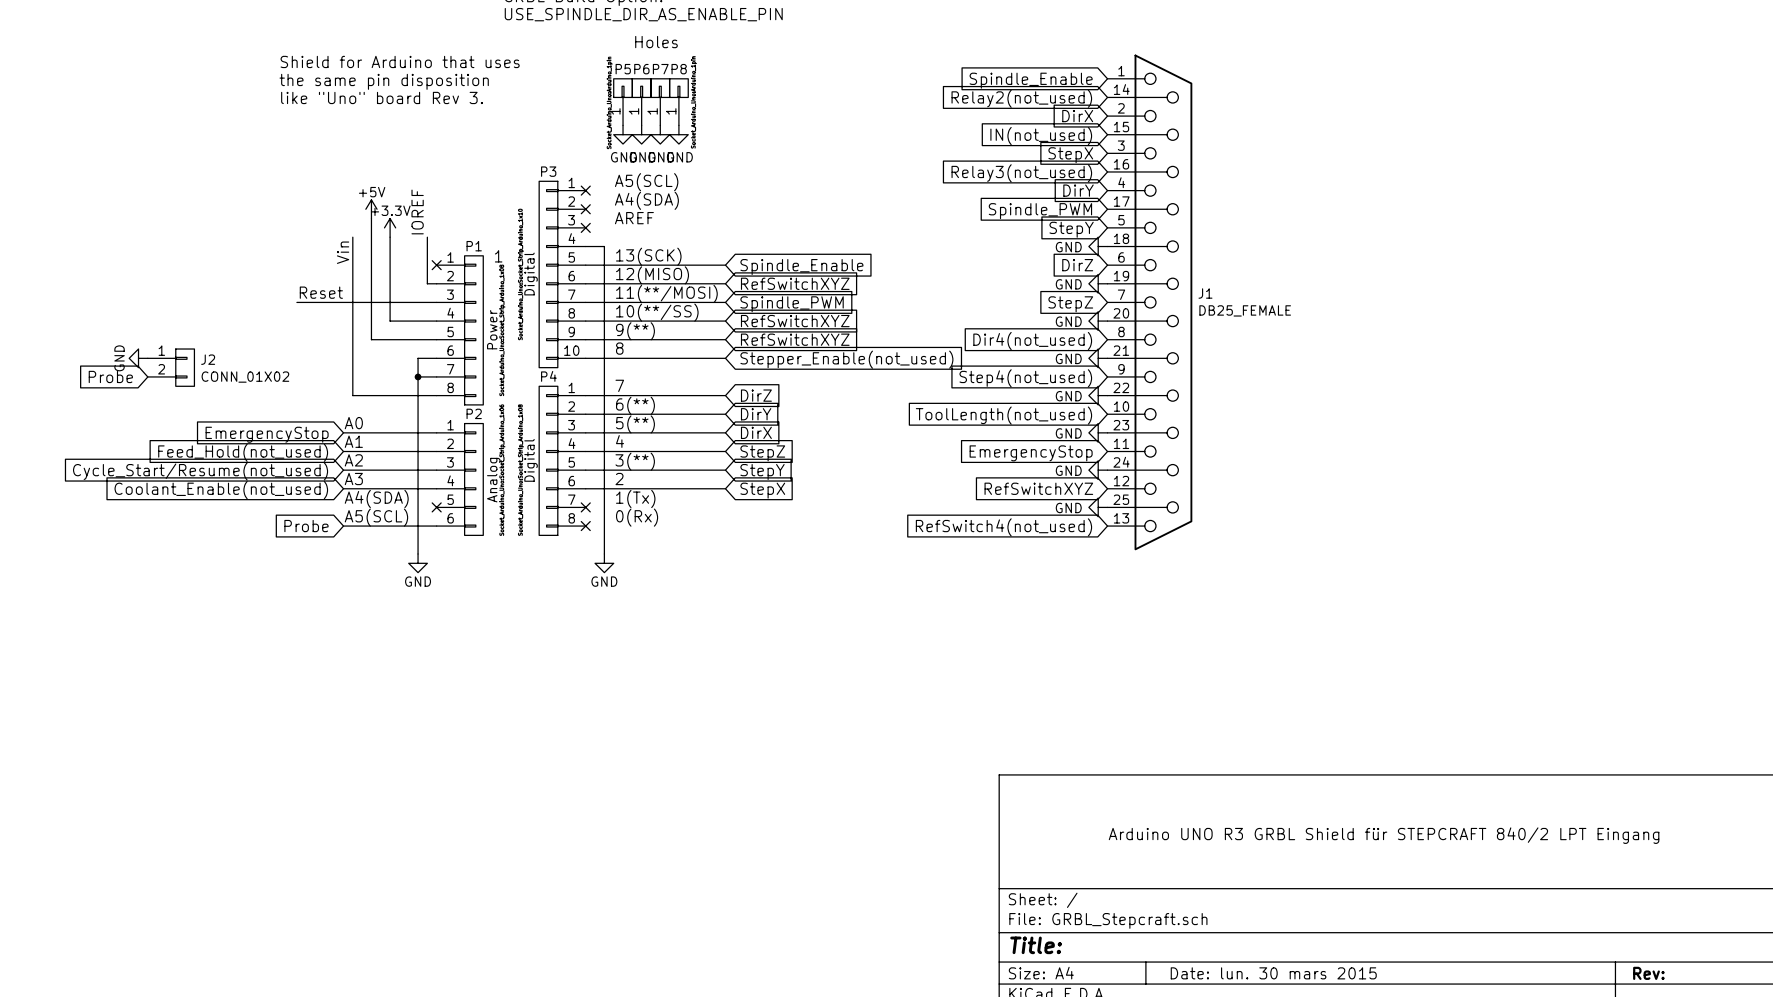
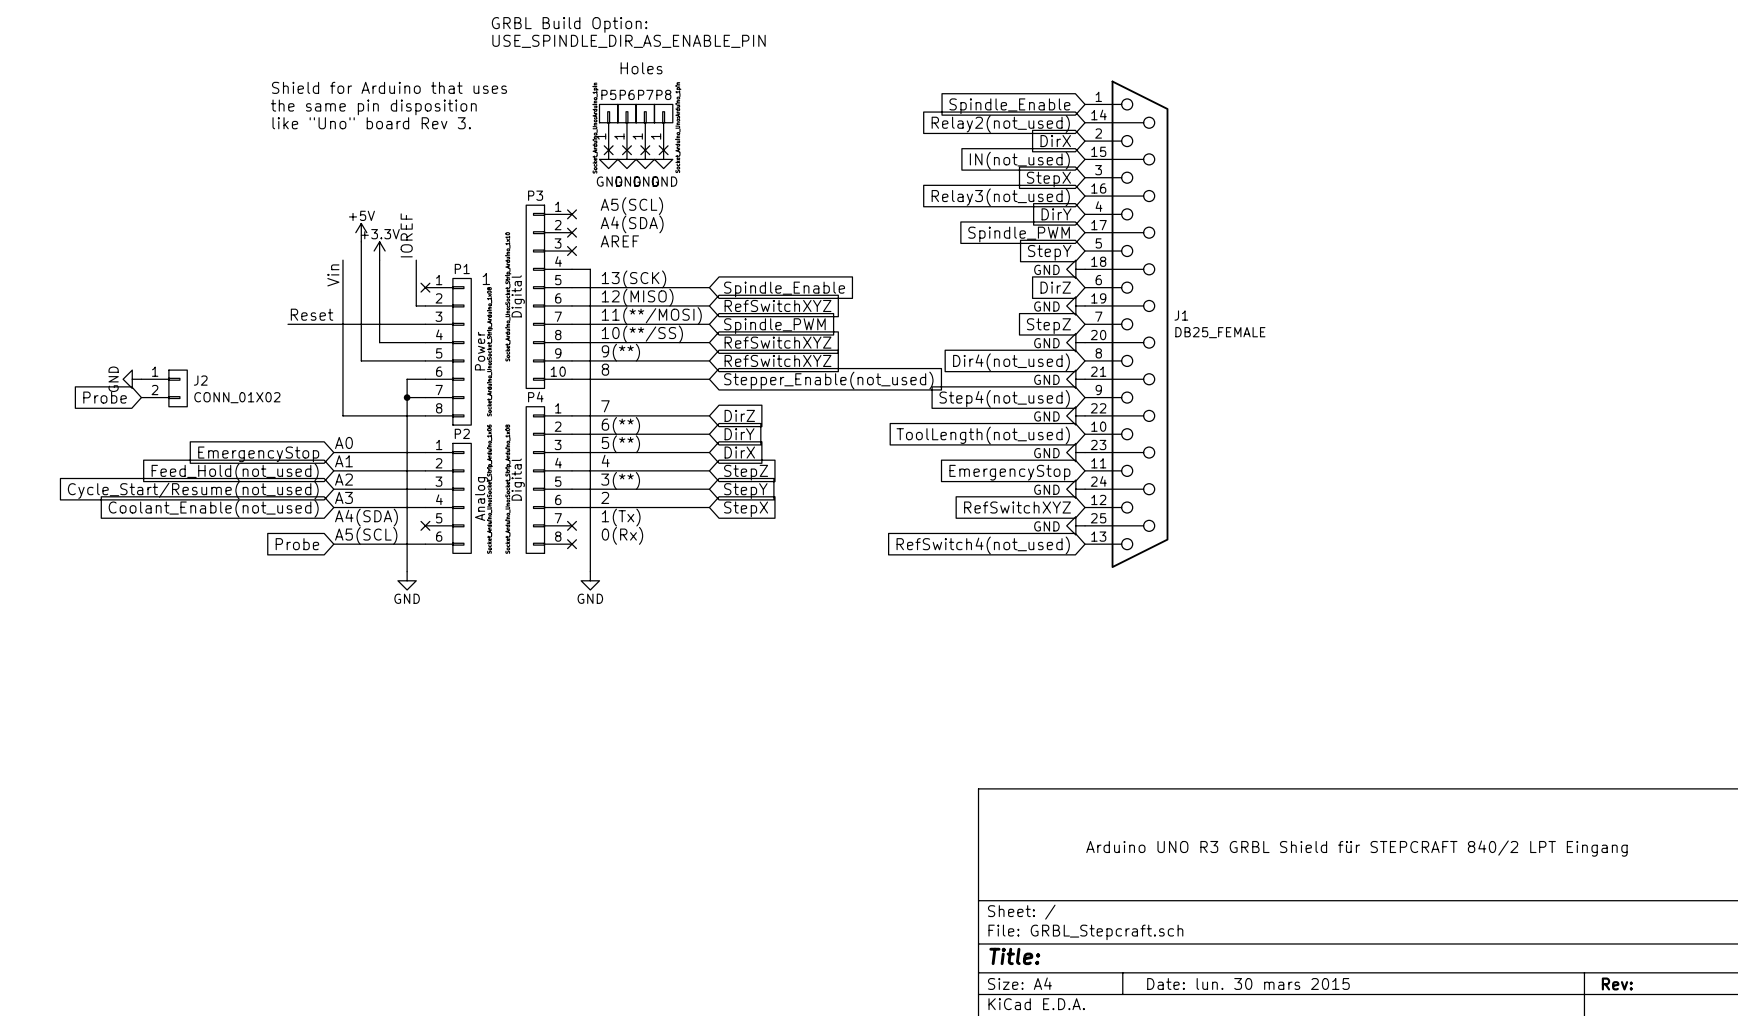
no-connect mark: none -> (608, 150)
no-connect mark: none -> (626, 150)
no-connect mark: none -> (645, 150)
no-connect mark: none -> (663, 150)

